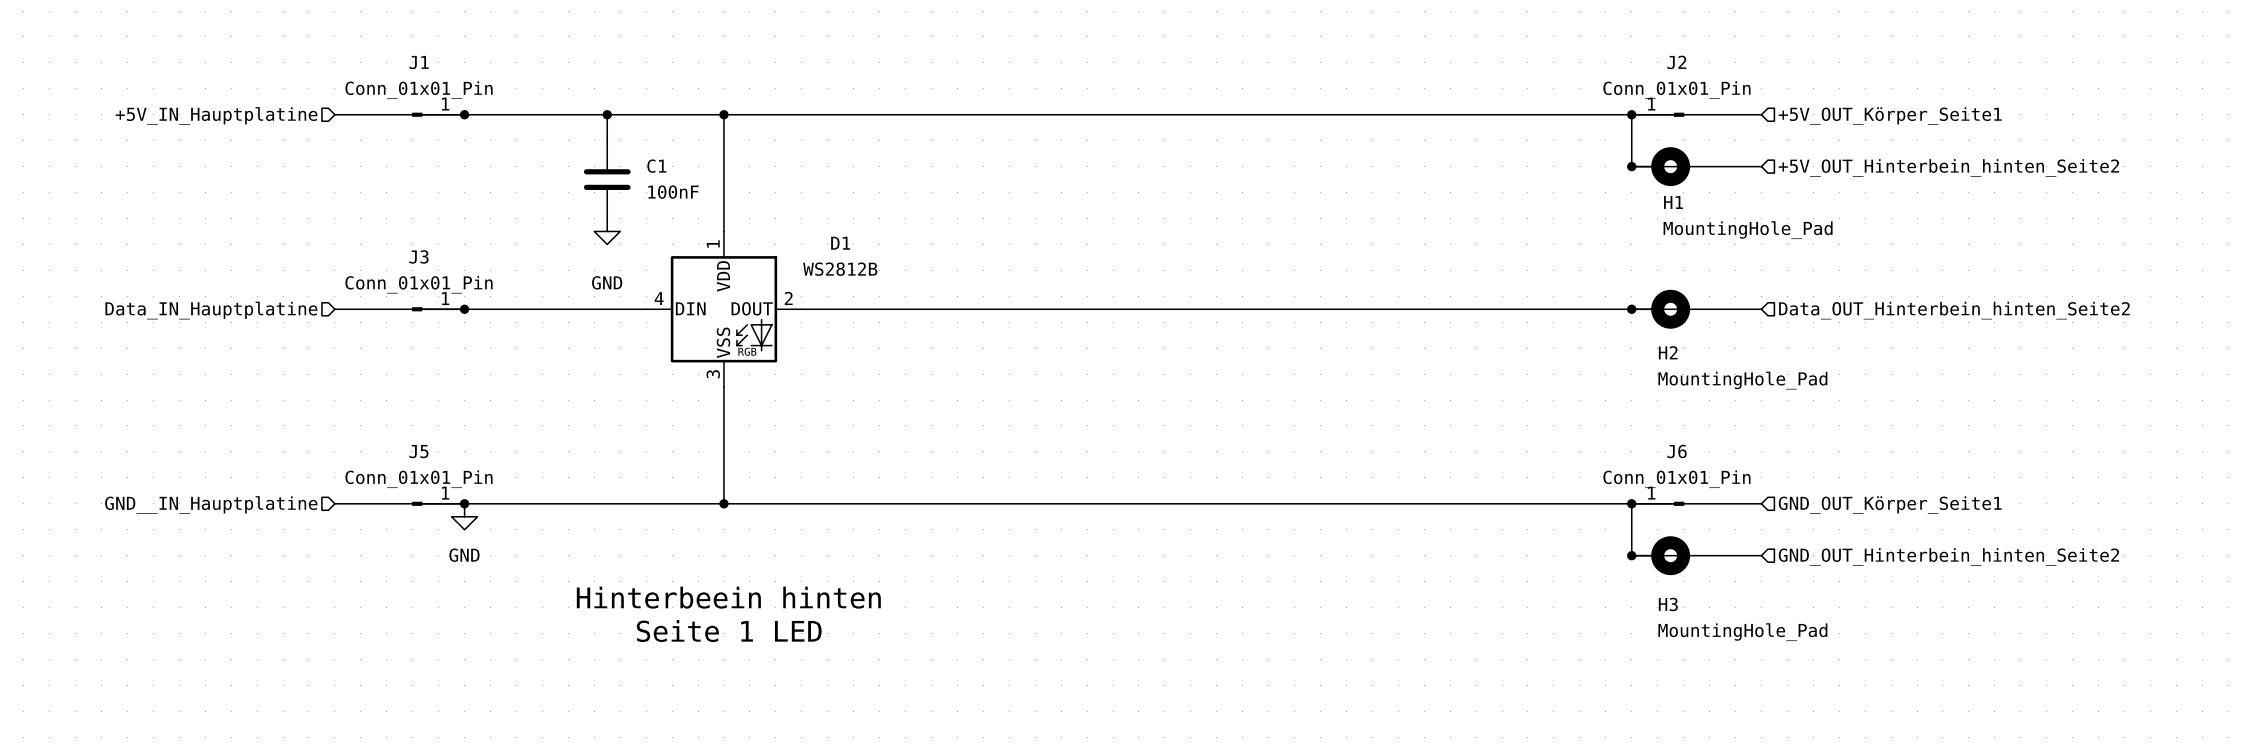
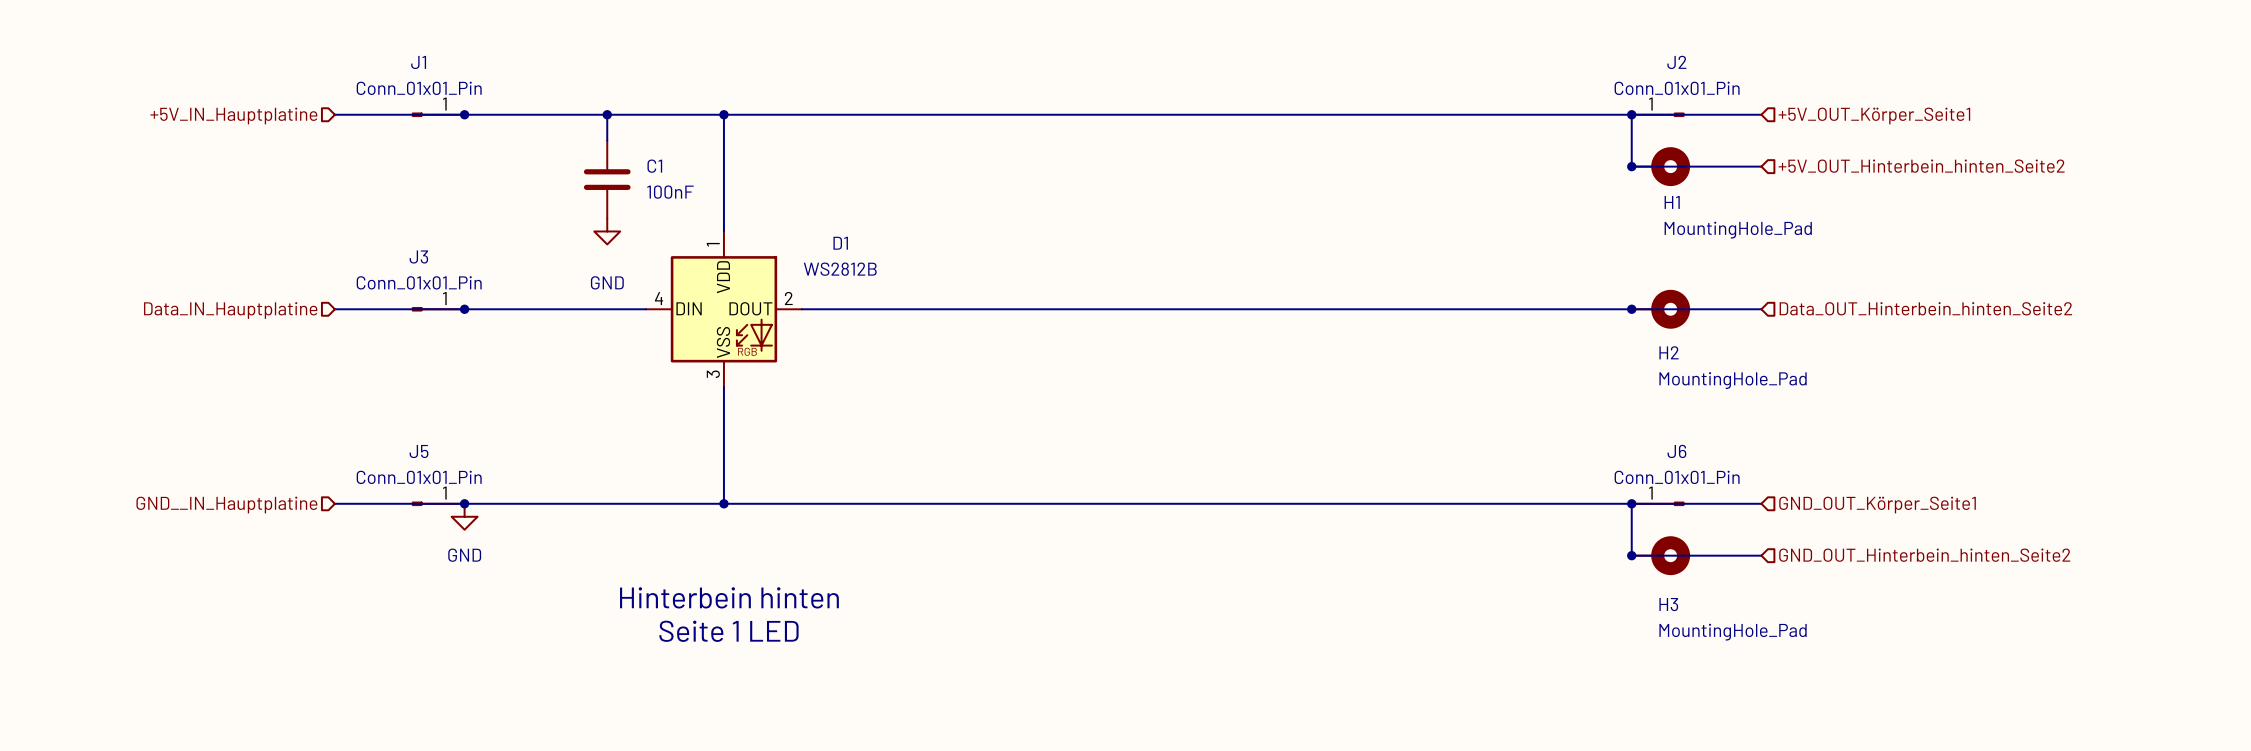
text: Hinterbeein hinten (728, 597) -> Hinterbein hinten (729, 597)

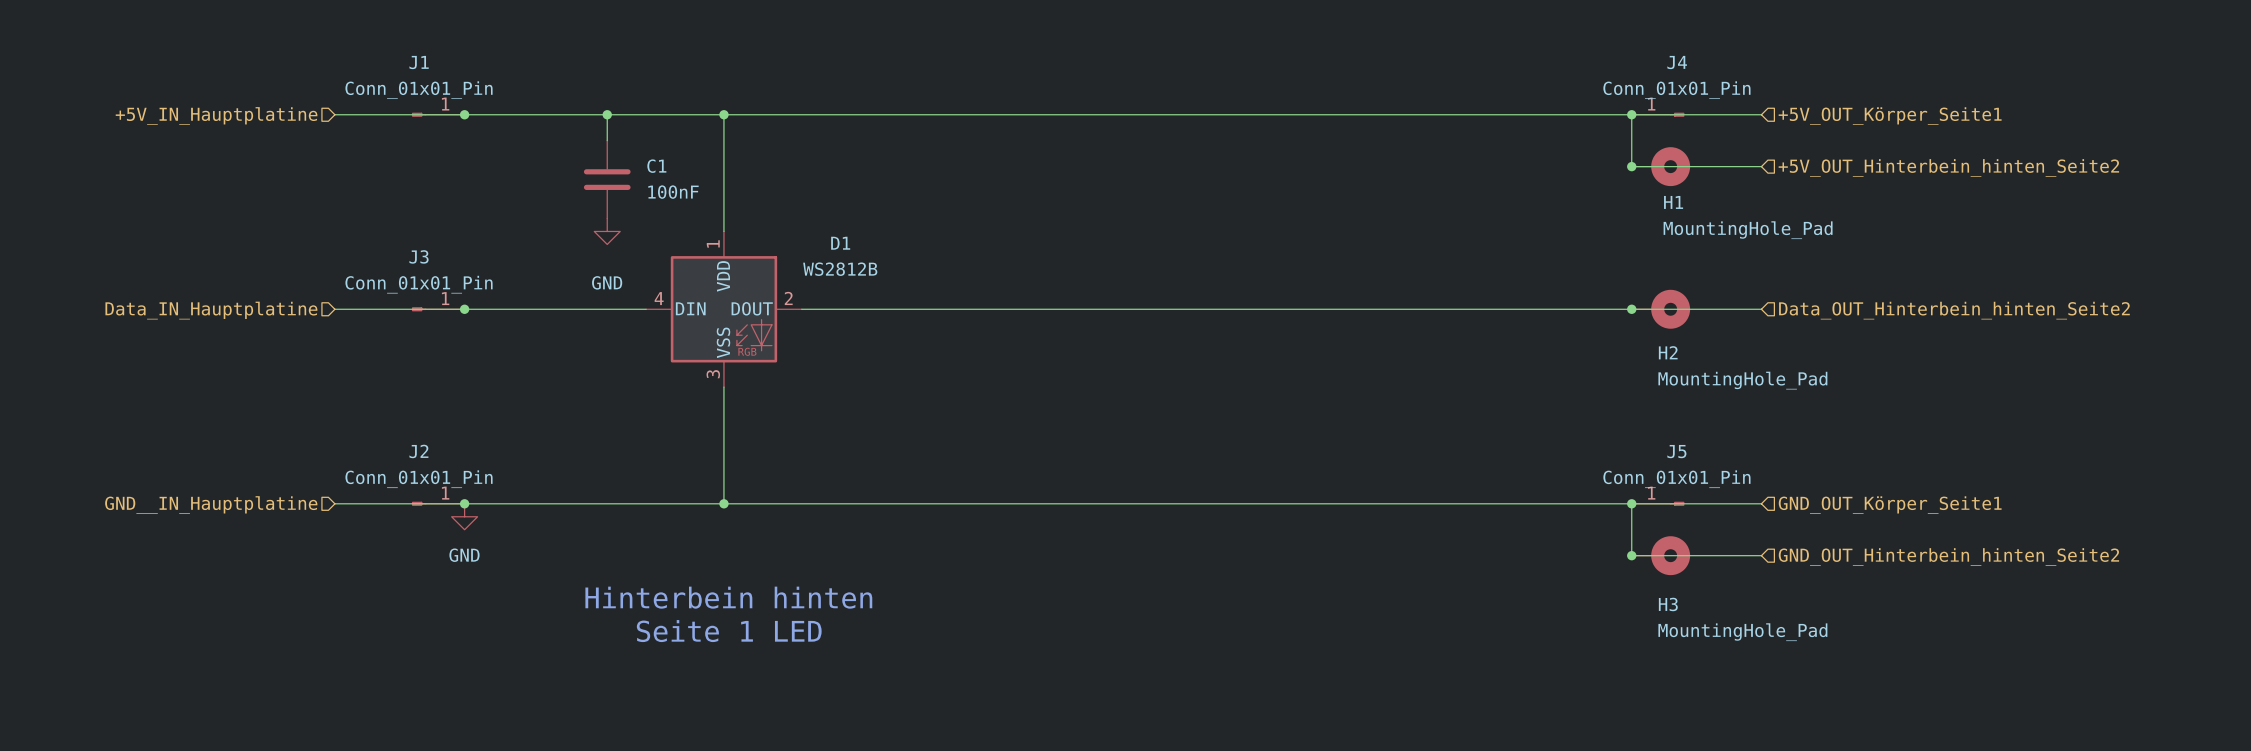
J2 name: J2 (1676, 62) -> J4 (1677, 62)
J5 name: J5 (419, 451) -> J2 (418, 451)
J6 name: J6 (1676, 451) -> J5 (1676, 451)

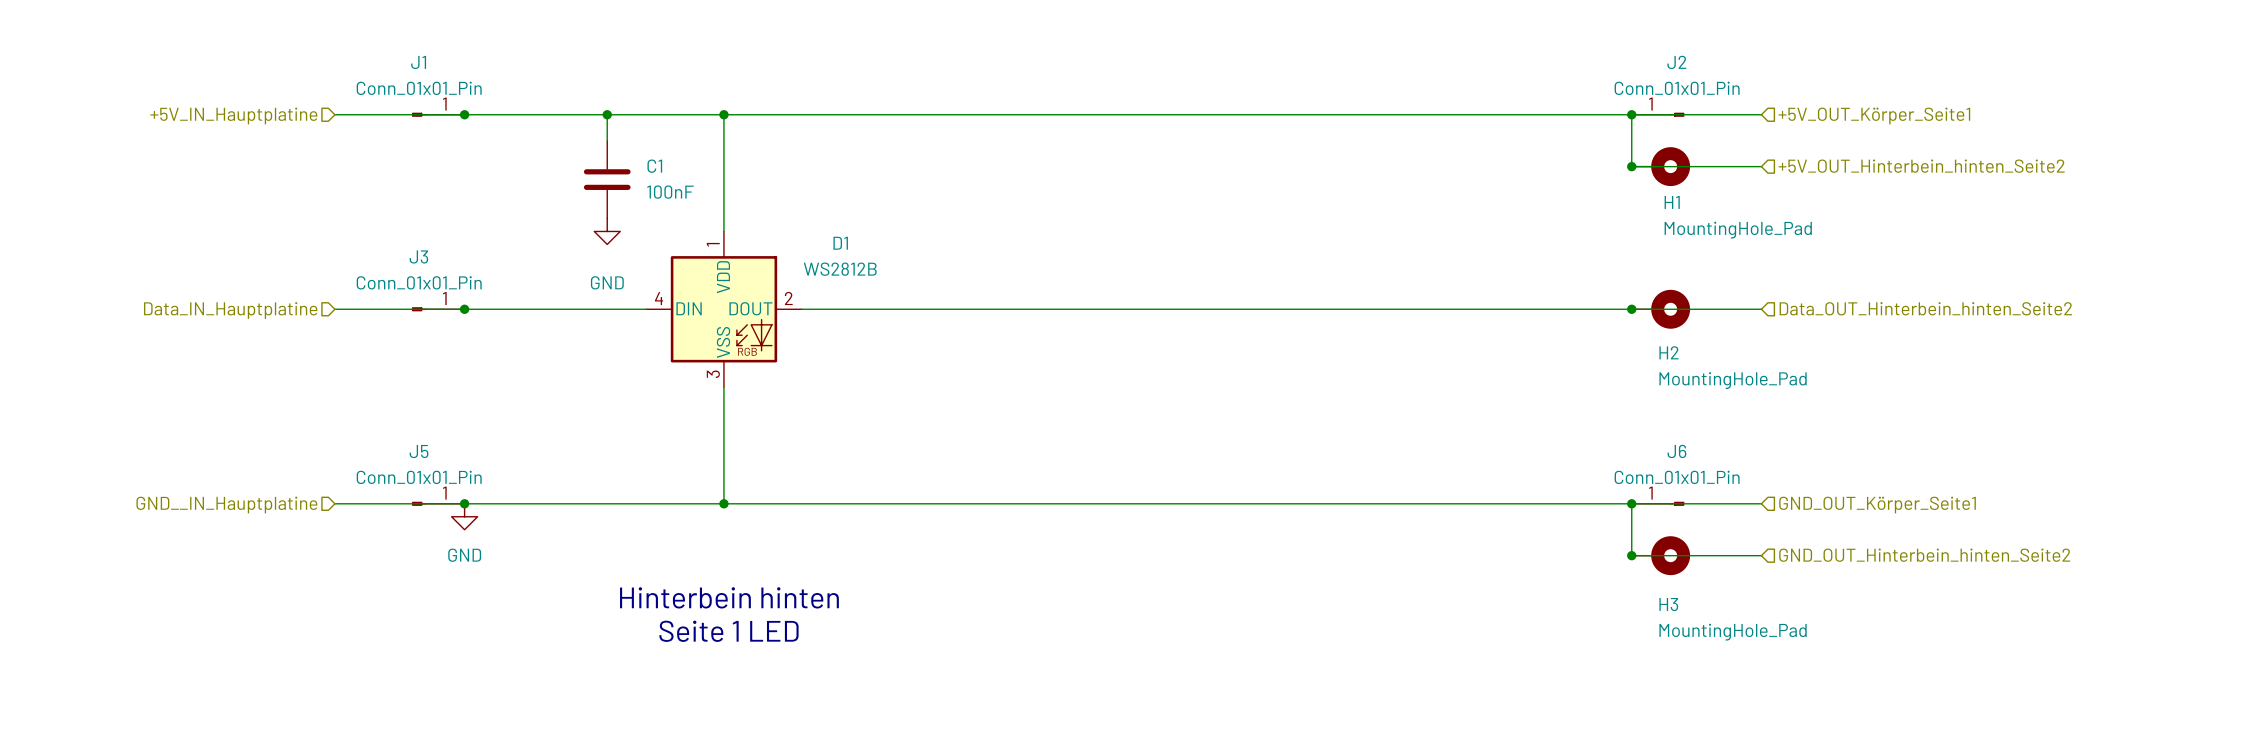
J4 name: J4 (1677, 62) -> J2 (1676, 62)
J2 name: J2 (418, 451) -> J5 (419, 451)
J5 name: J5 (1676, 451) -> J6 (1676, 451)

